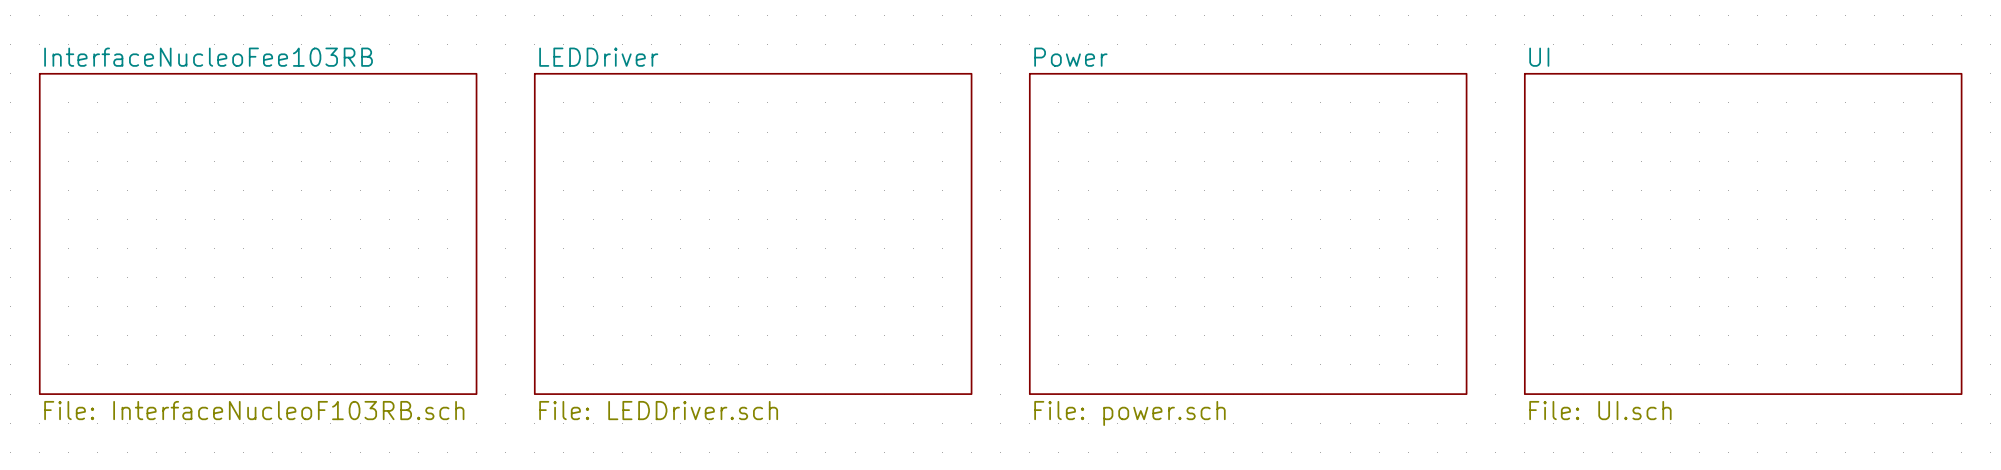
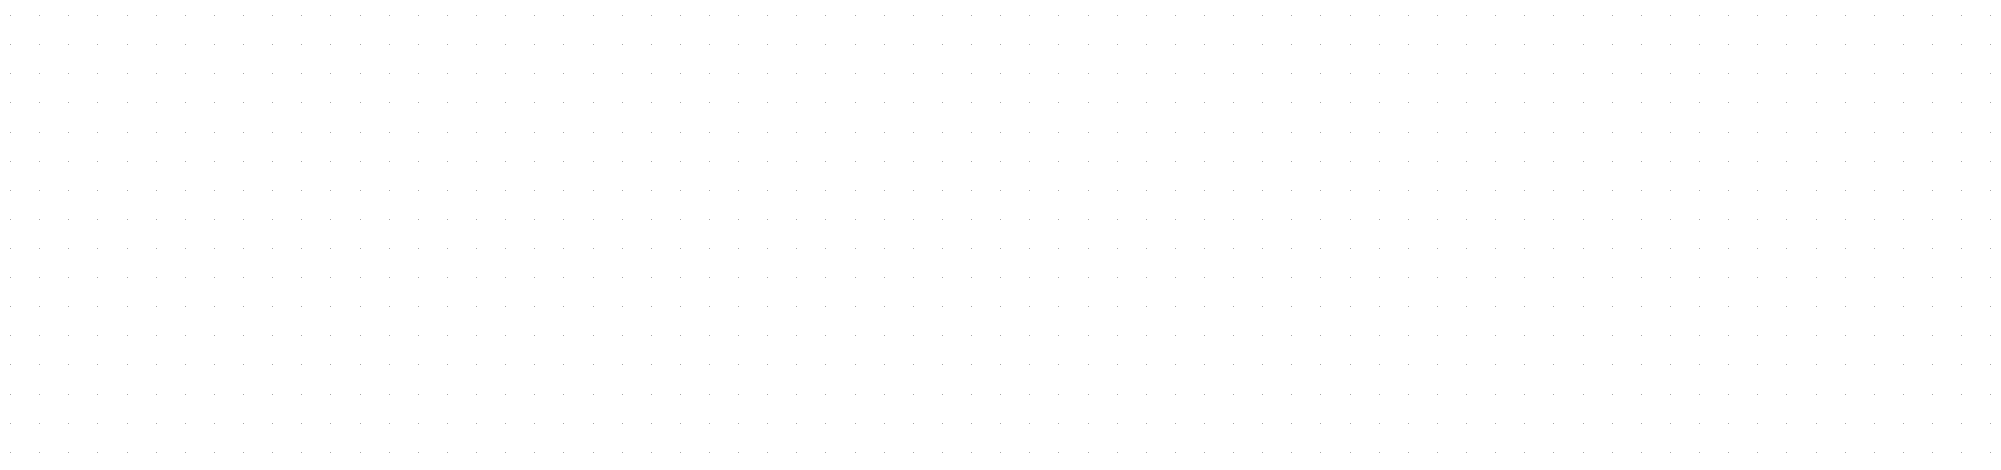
sheet InterfaceNucleoFee103RB: File: InterfaceNucleoF103RB.sch (258, 233) -> none
sheet LEDDriver: File: LEDDriver.sch (753, 233) -> none
sheet Power: File: power.sch (1248, 233) -> none
sheet UI: File: UI.sch (1743, 233) -> none

